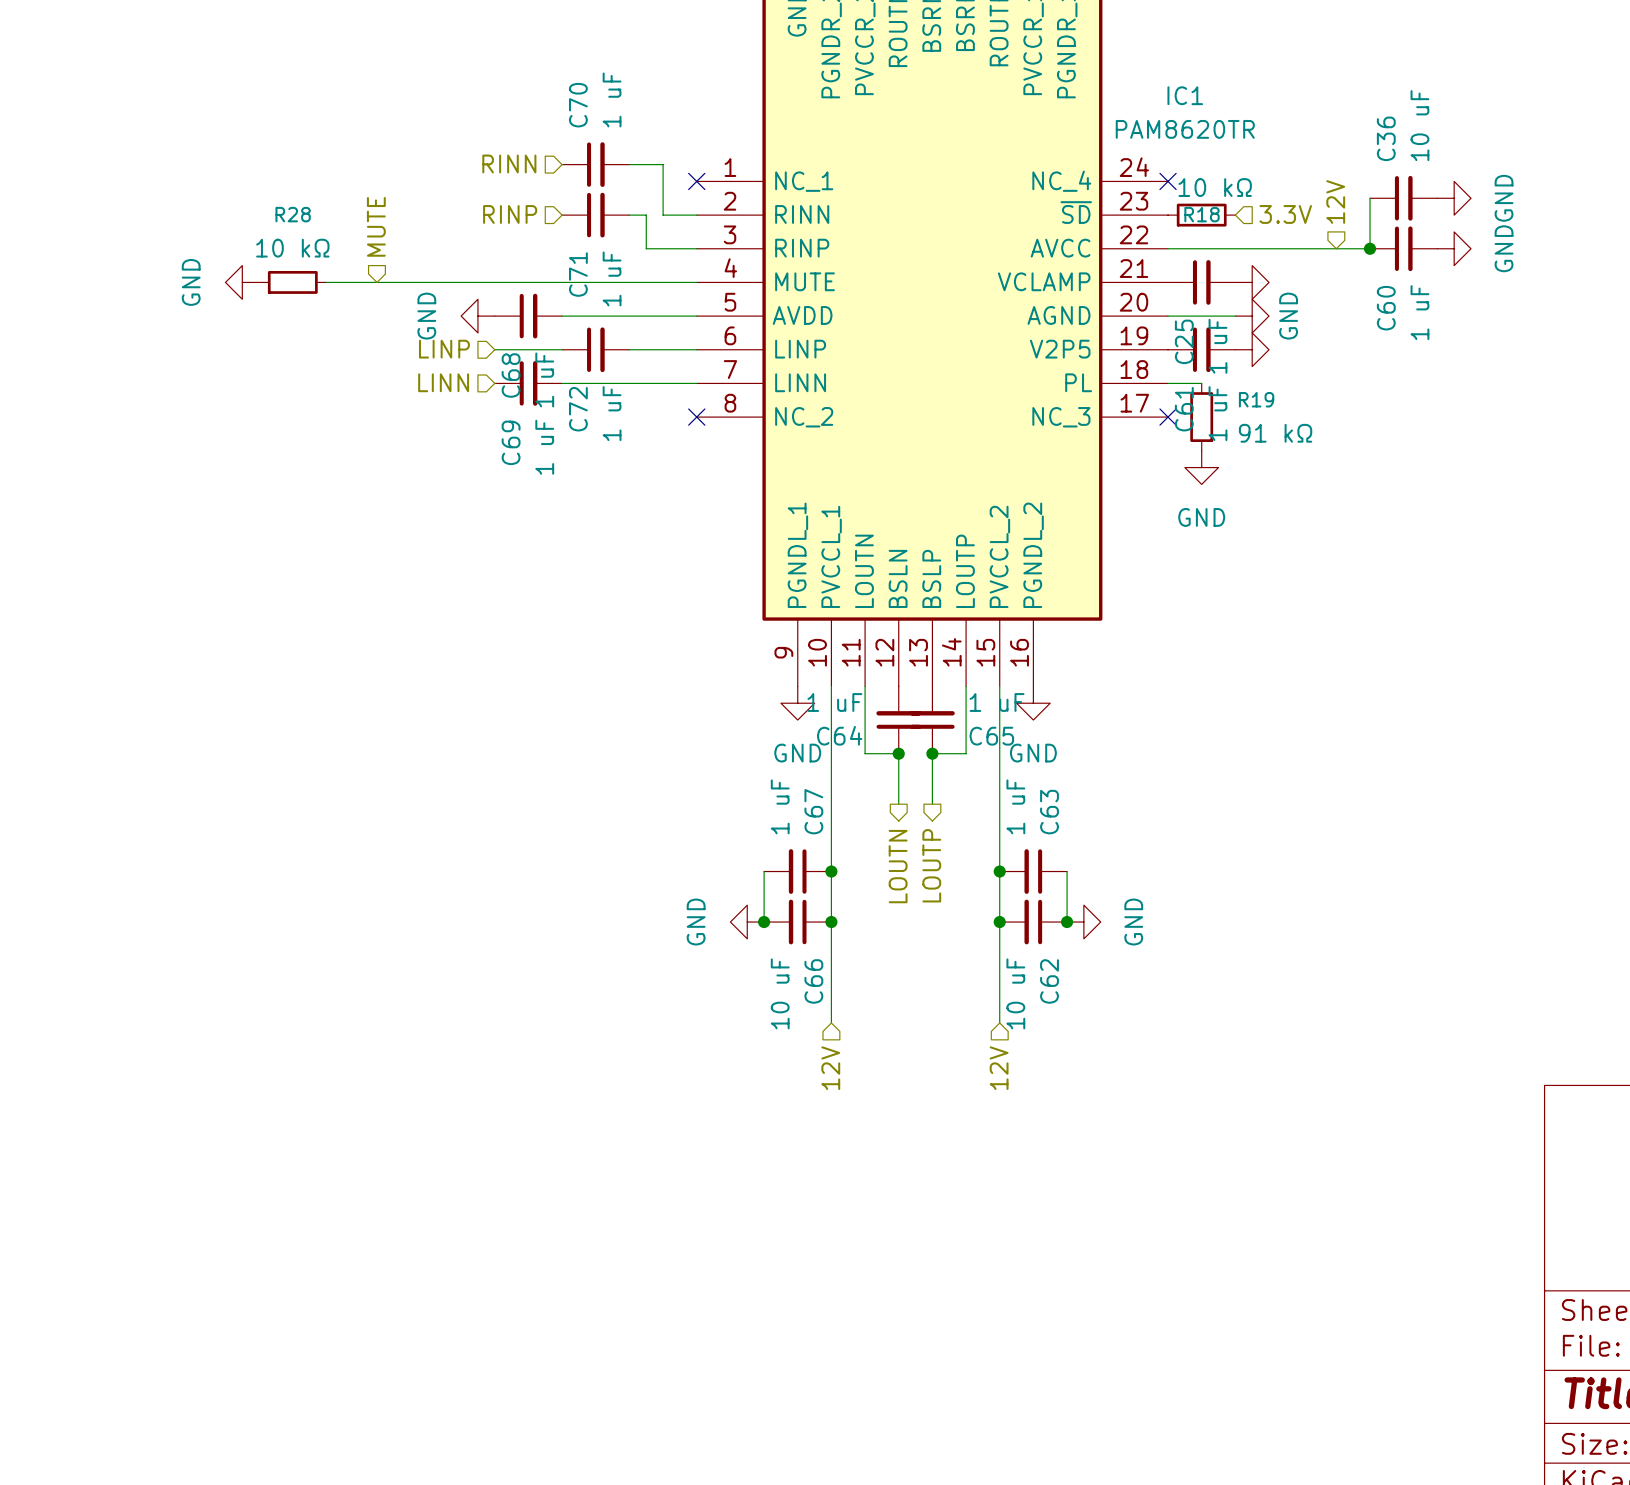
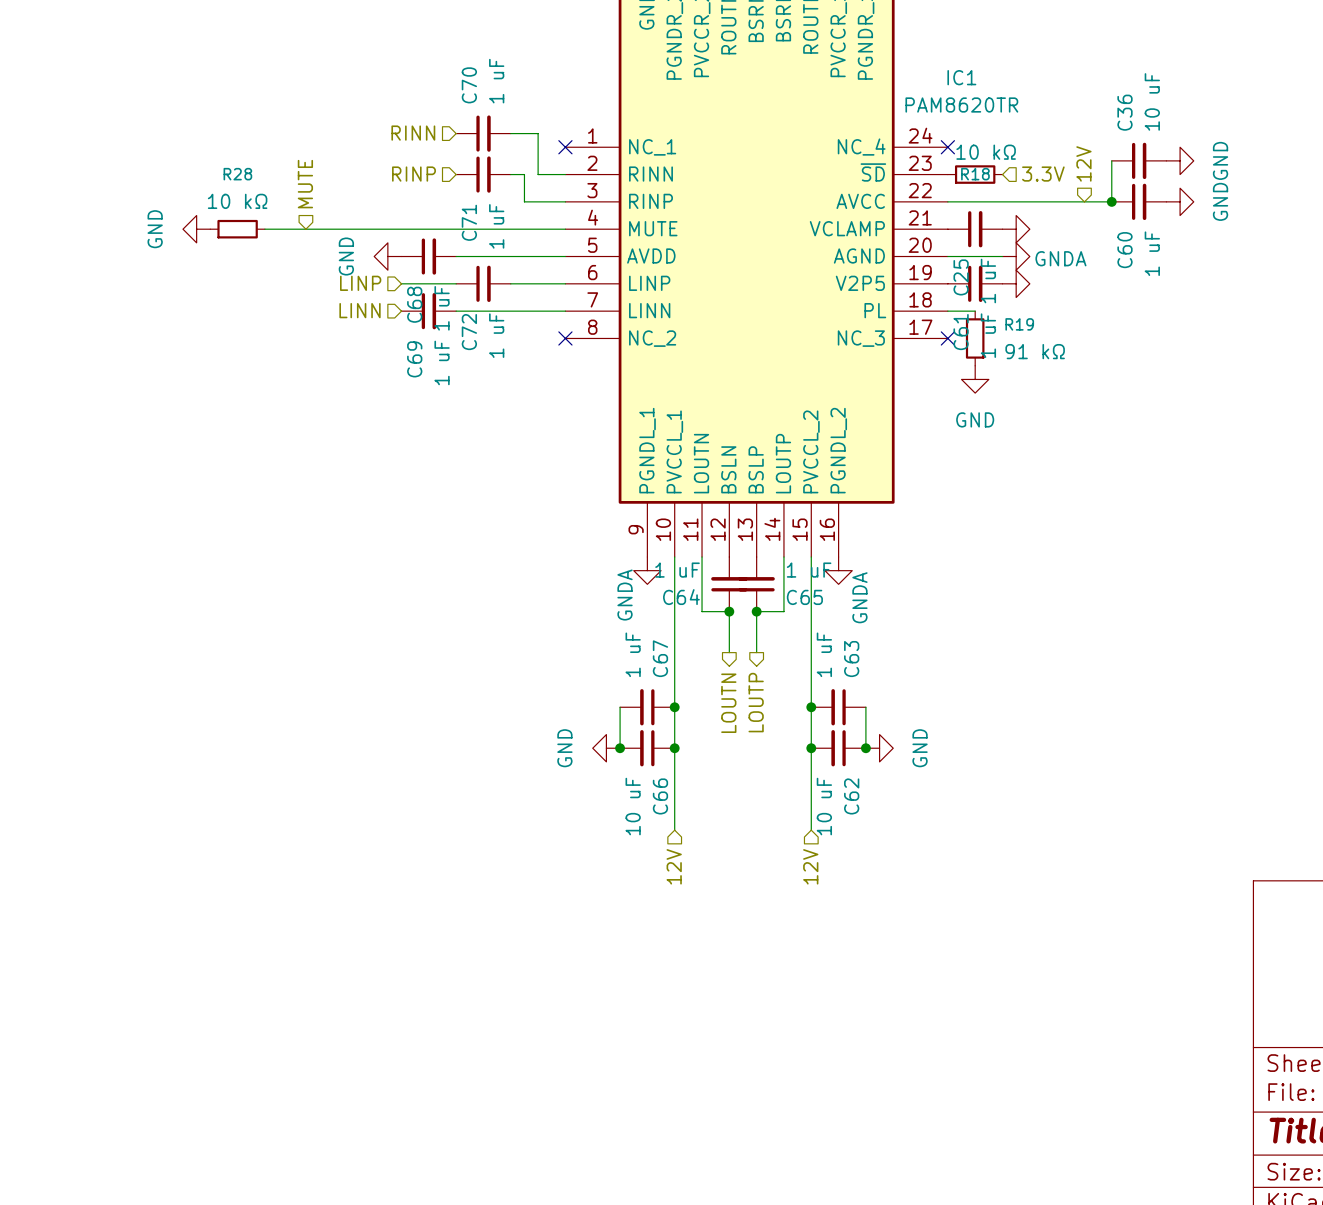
power symbol: GND (1252, 316) -> GNDA (1016, 256)
power symbol: GND (797, 703) -> GNDA (647, 570)
power symbol: GND (1033, 703) -> GNDA (838, 570)

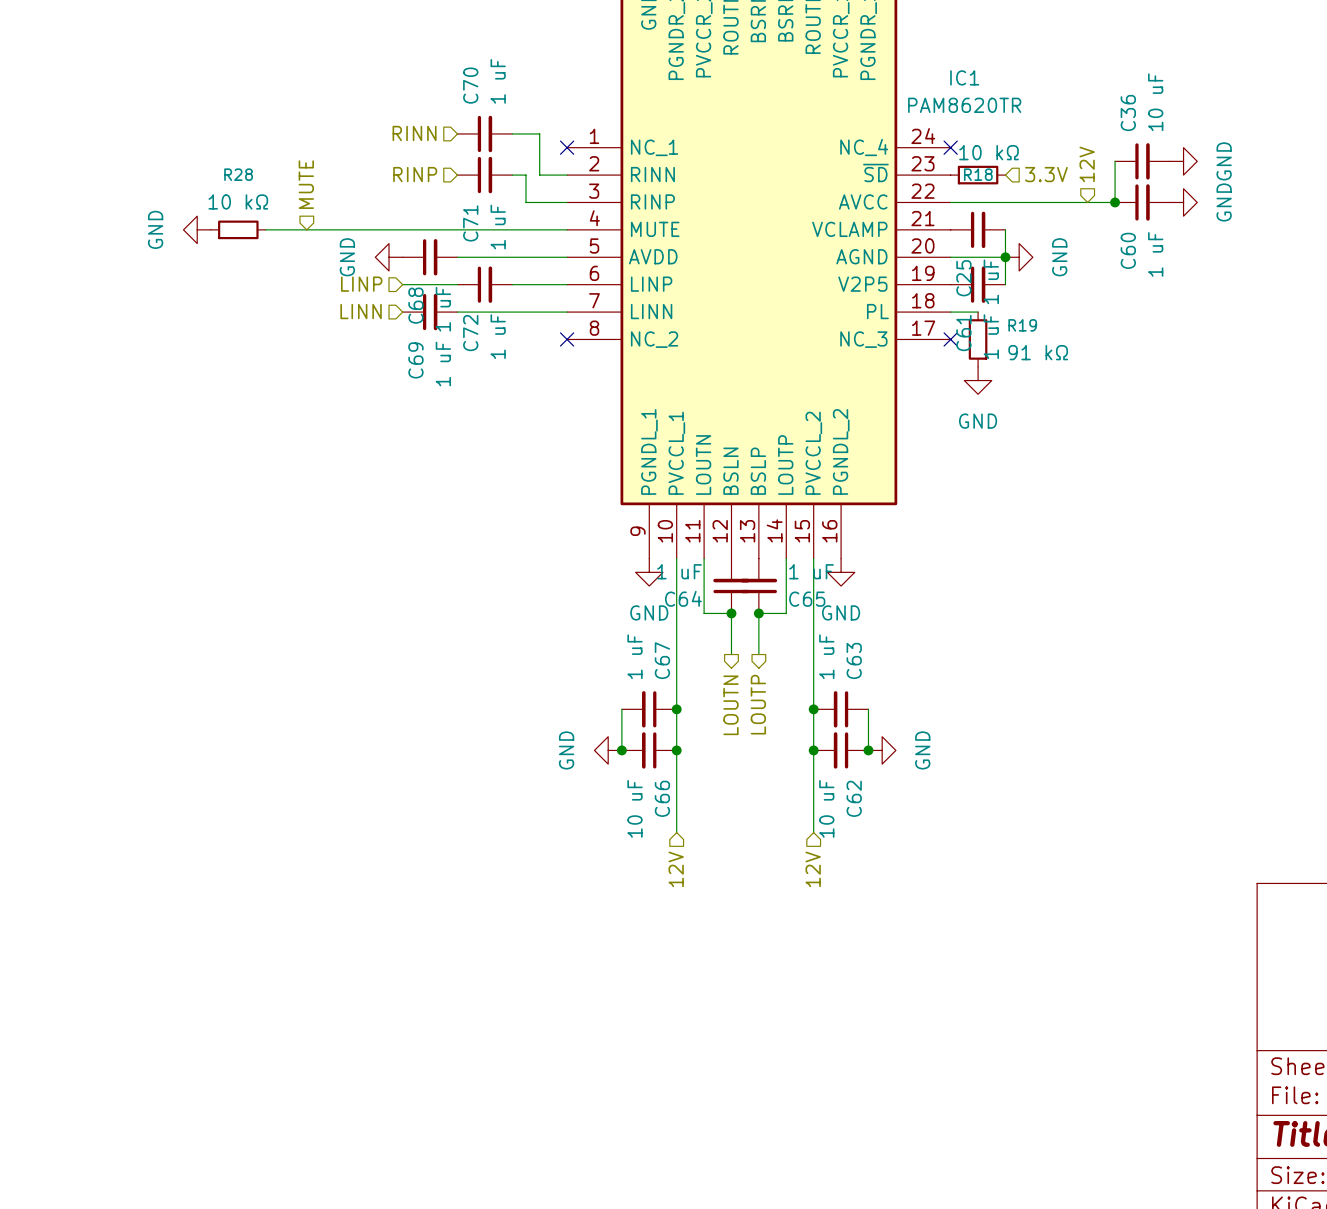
wire: none -> (1005, 229) (1005, 284)
power symbol: (1016, 229) -> none
junction: none -> (1005, 257)
power symbol: GNDA (1016, 256) -> GND (1019, 257)
power symbol: (1016, 283) -> none
power symbol: GNDA (647, 570) -> GND (649, 572)
power symbol: GNDA (838, 570) -> GND (841, 572)

